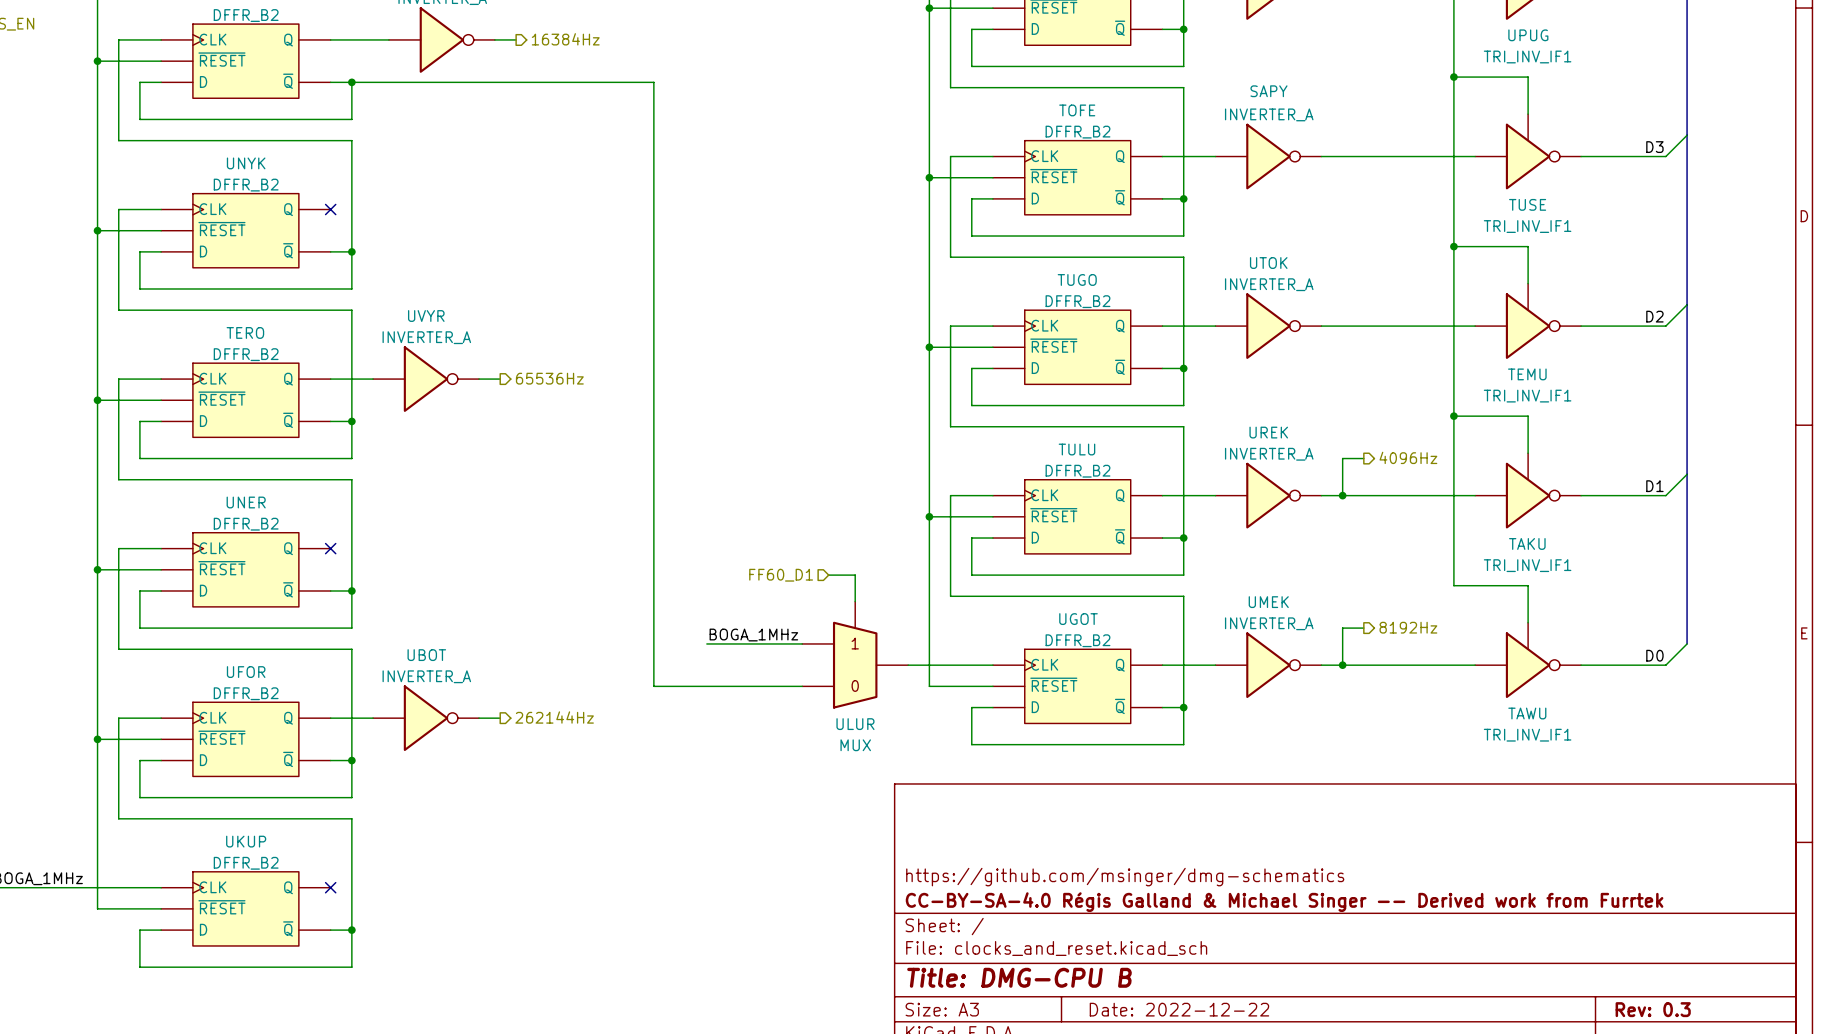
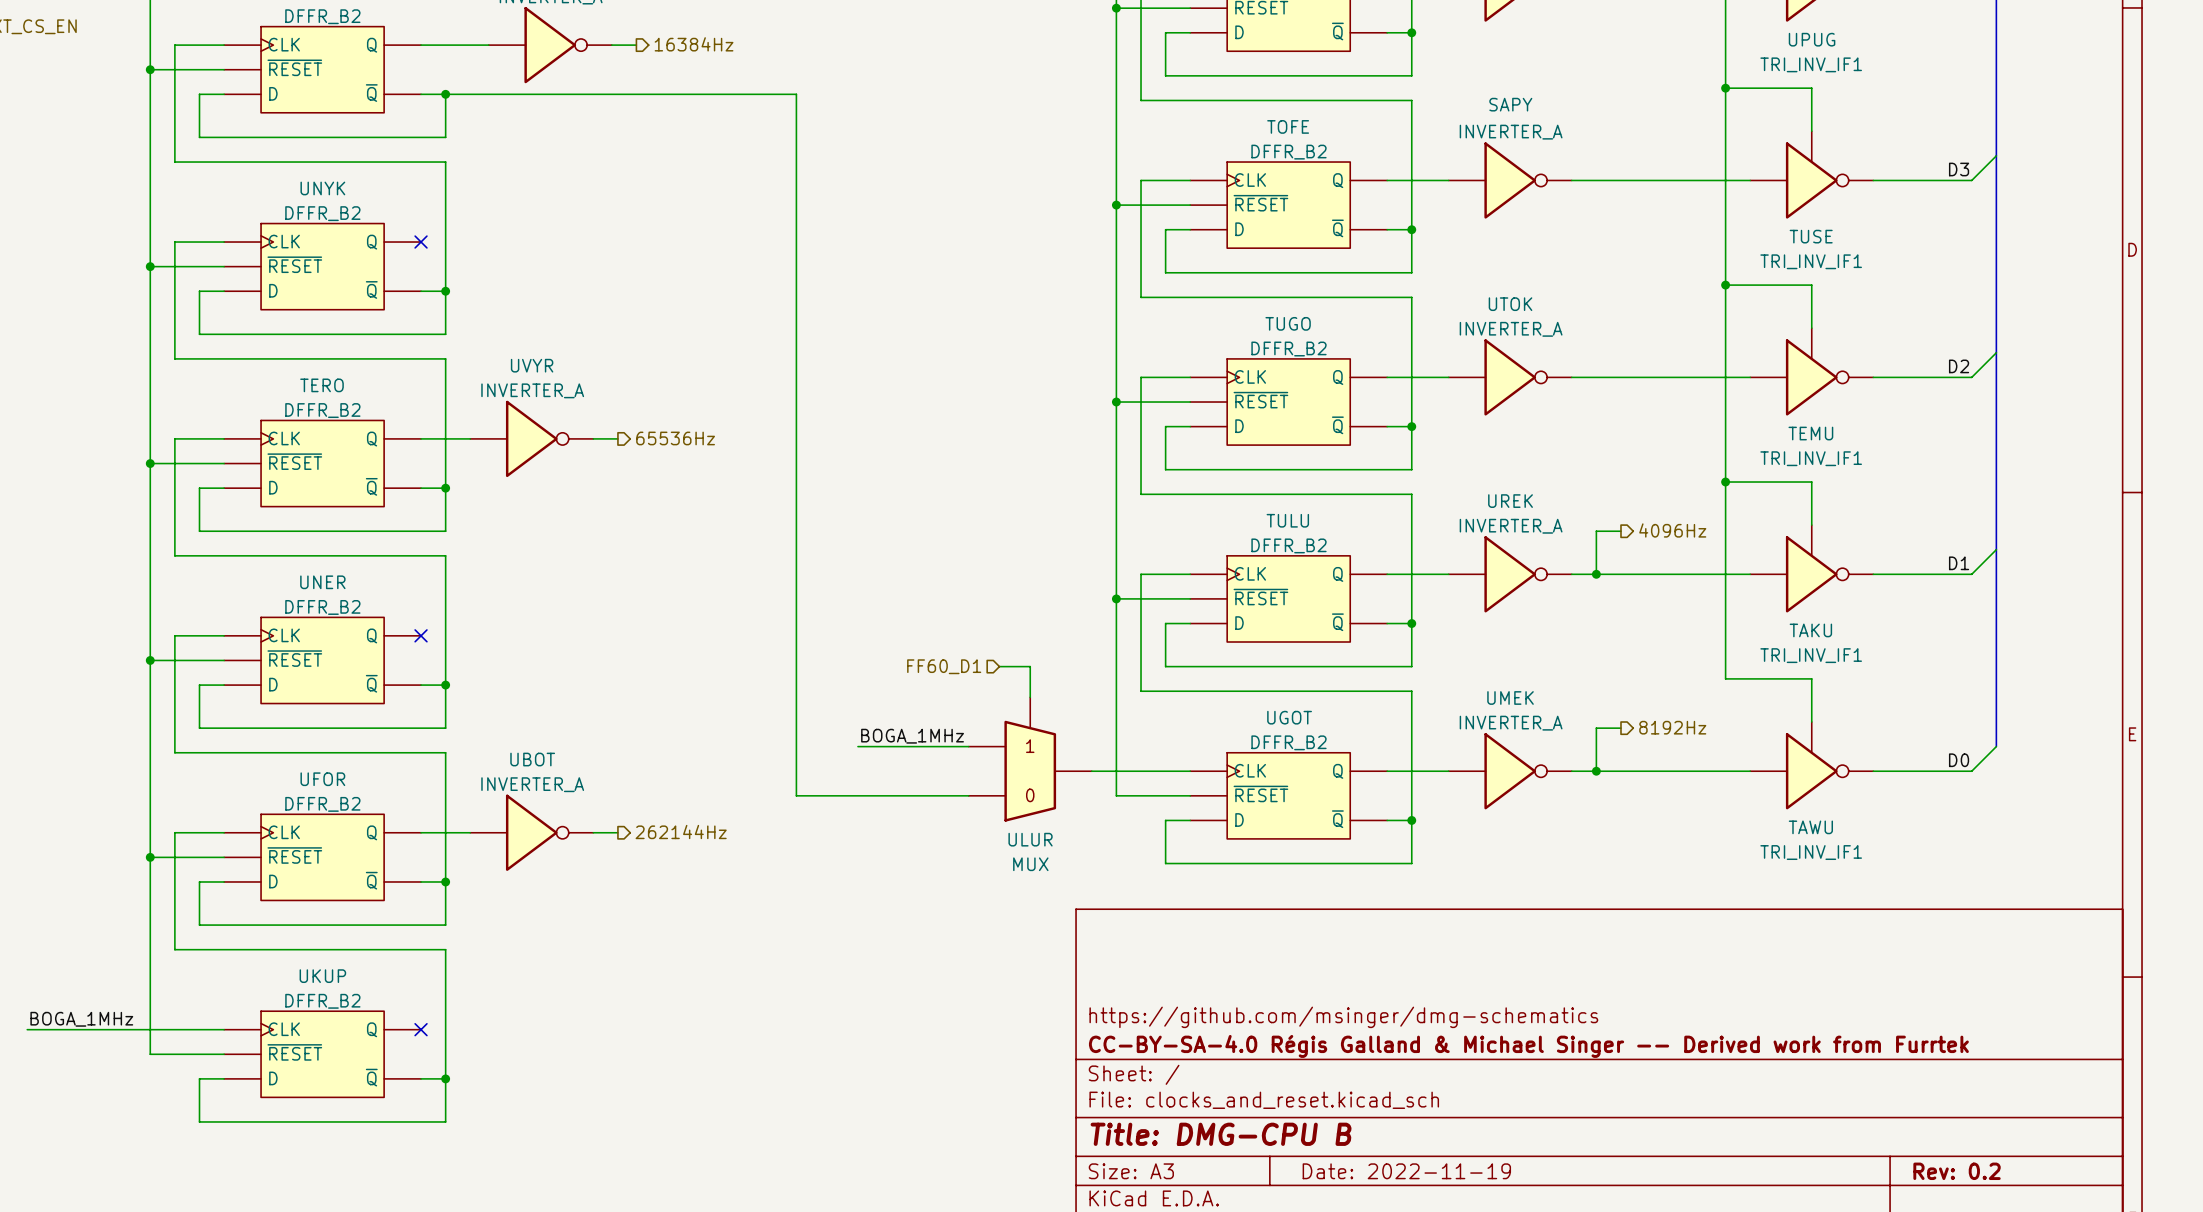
title block: Date: 2022-12-22 (1179, 1009) -> Date: 2022-11-19 (1406, 1171)
title block: Rev: 0.3 (1653, 1009) -> Rev: 0.2 (1957, 1171)

